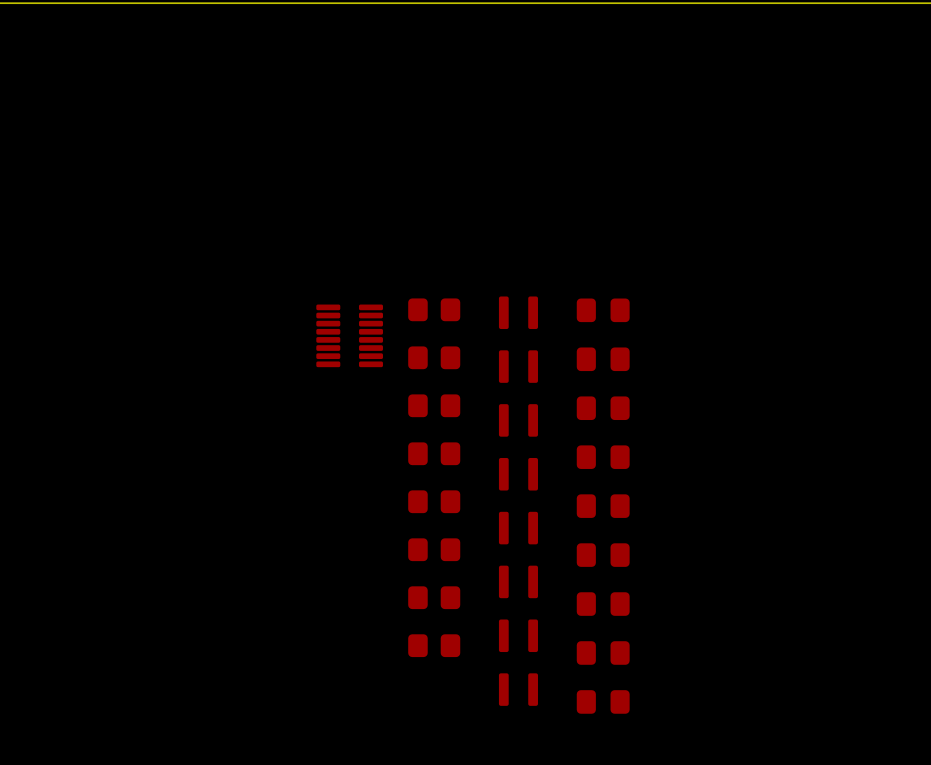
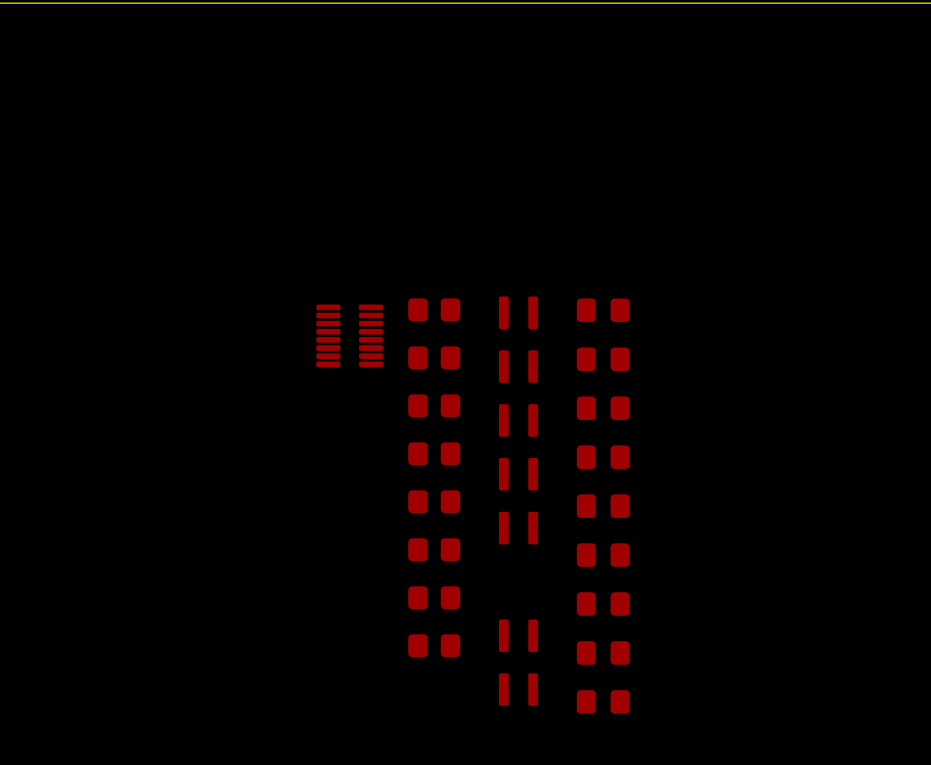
part: (518, 581) -> none

